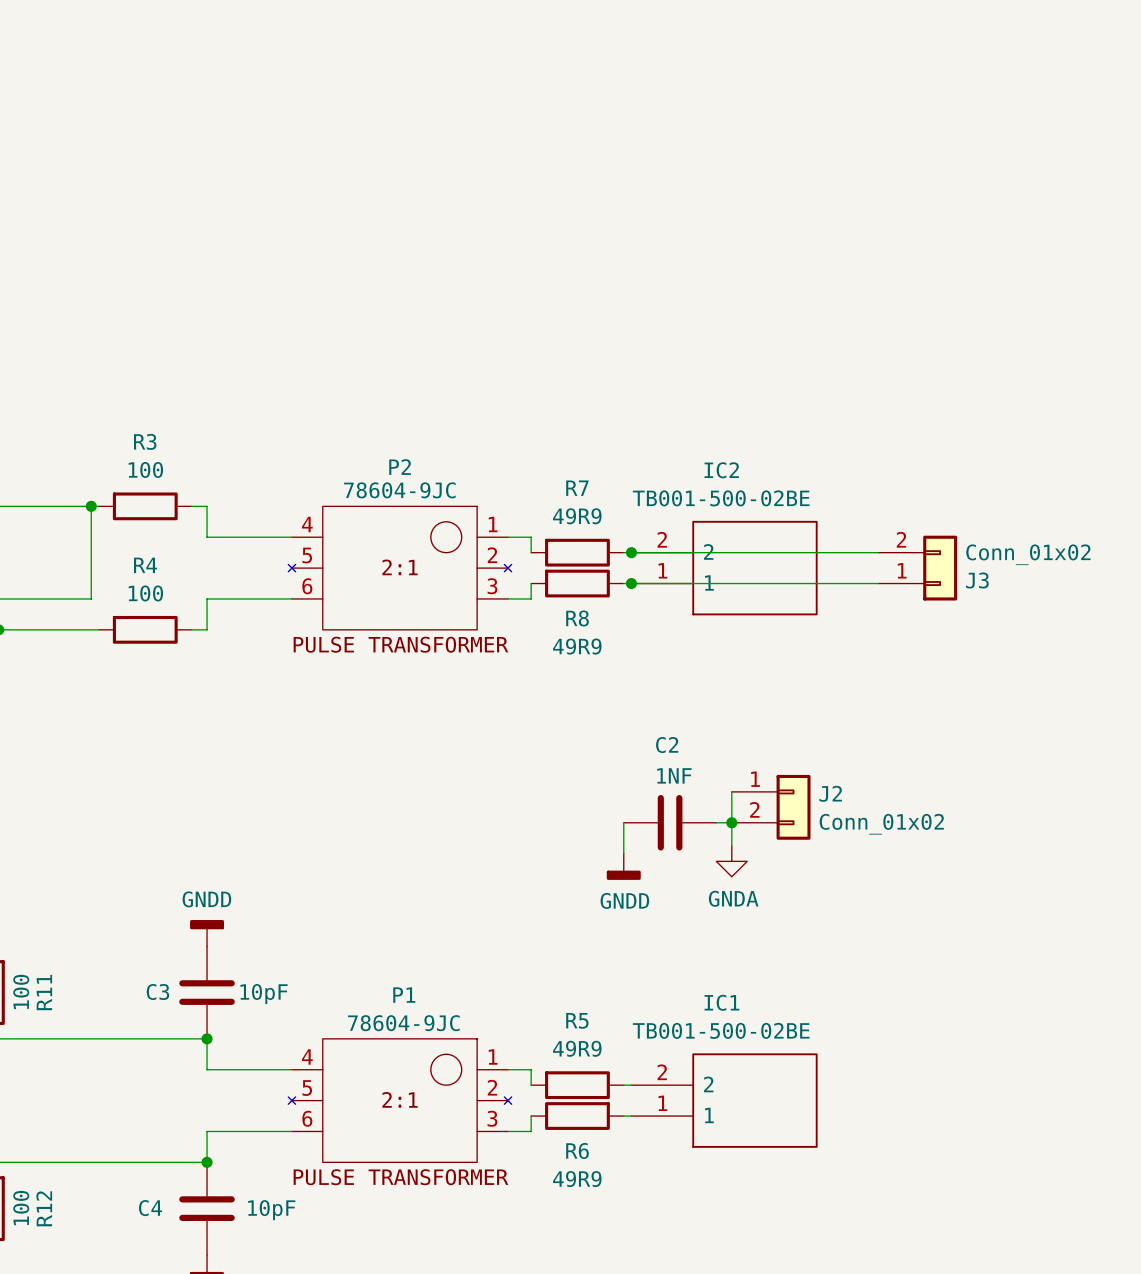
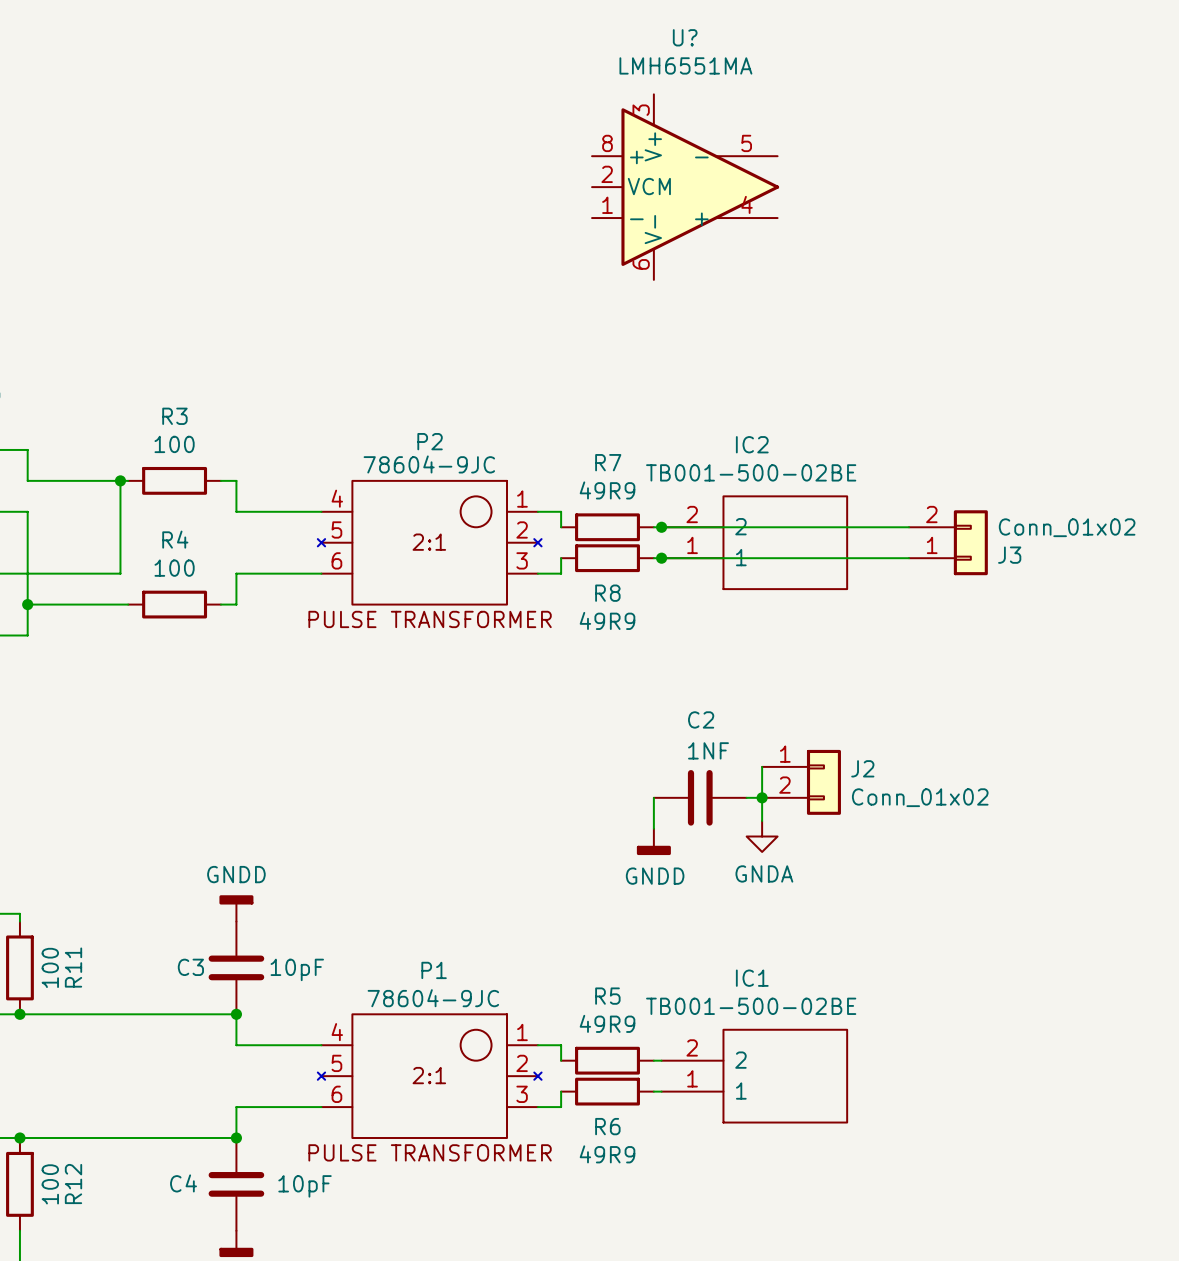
U?: none -> LMH6551MA (685, 187)

